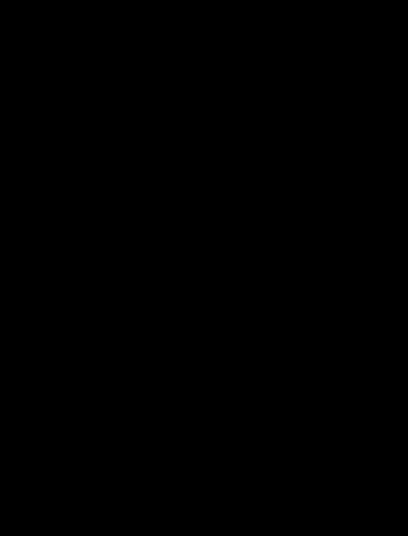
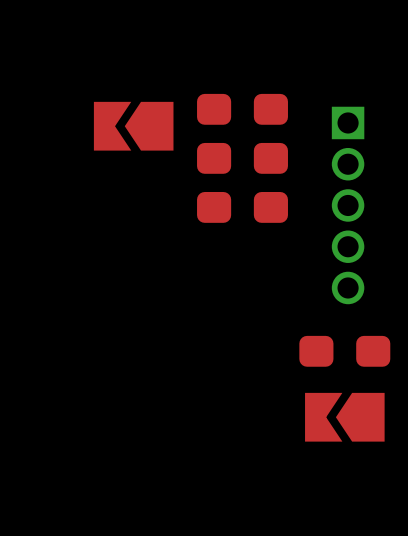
part: none -> (242, 109)
part: none -> (133, 126)
part: none -> (242, 158)
part: none -> (348, 205)
part: none -> (242, 207)
part: none -> (344, 351)
part: none -> (344, 417)

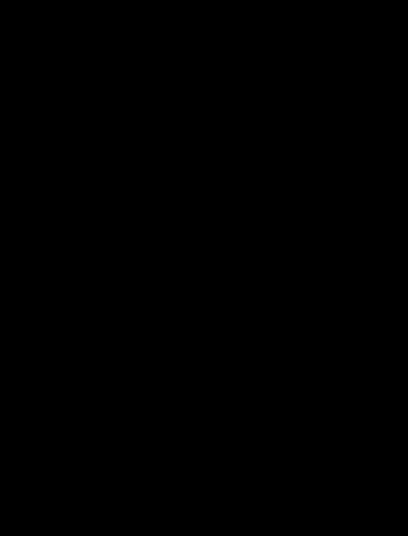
part: (242, 109) -> none
part: (133, 126) -> none
part: (242, 158) -> none
part: (348, 205) -> none
part: (242, 207) -> none
part: (344, 351) -> none
part: (344, 417) -> none

